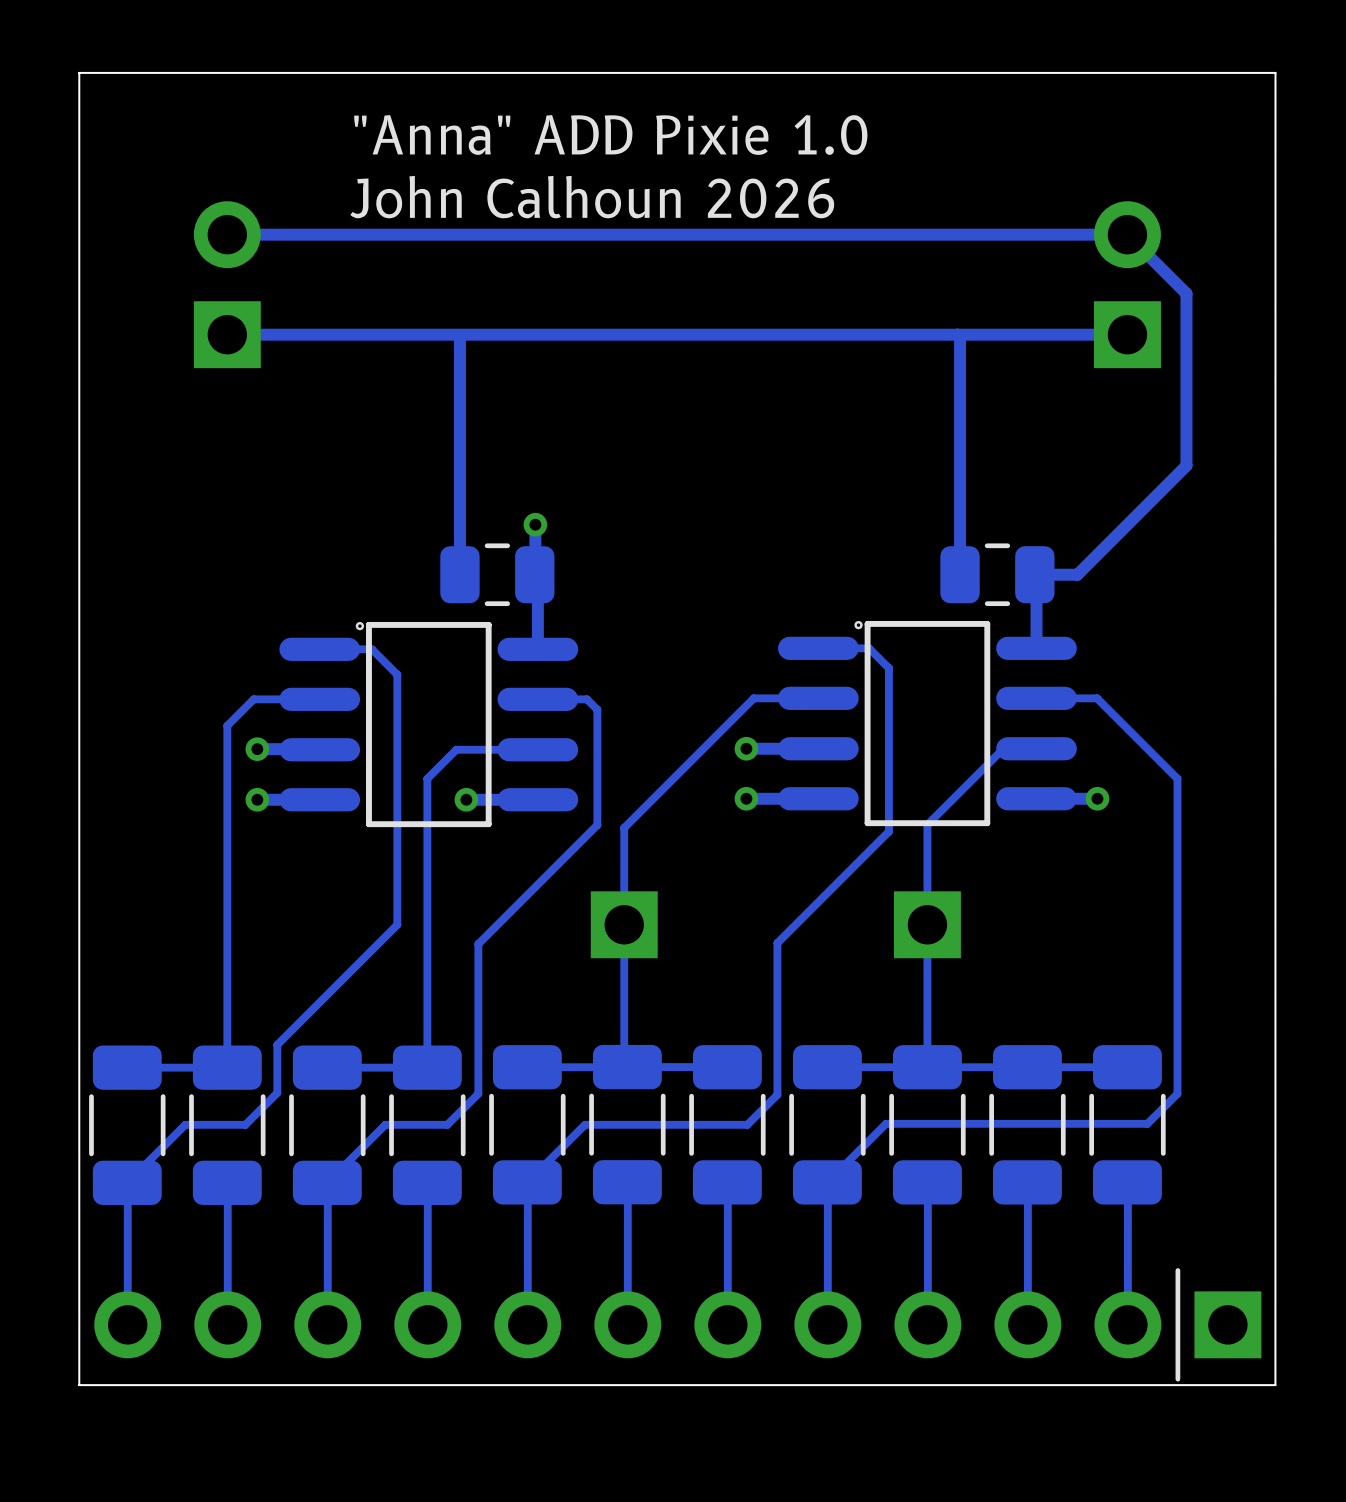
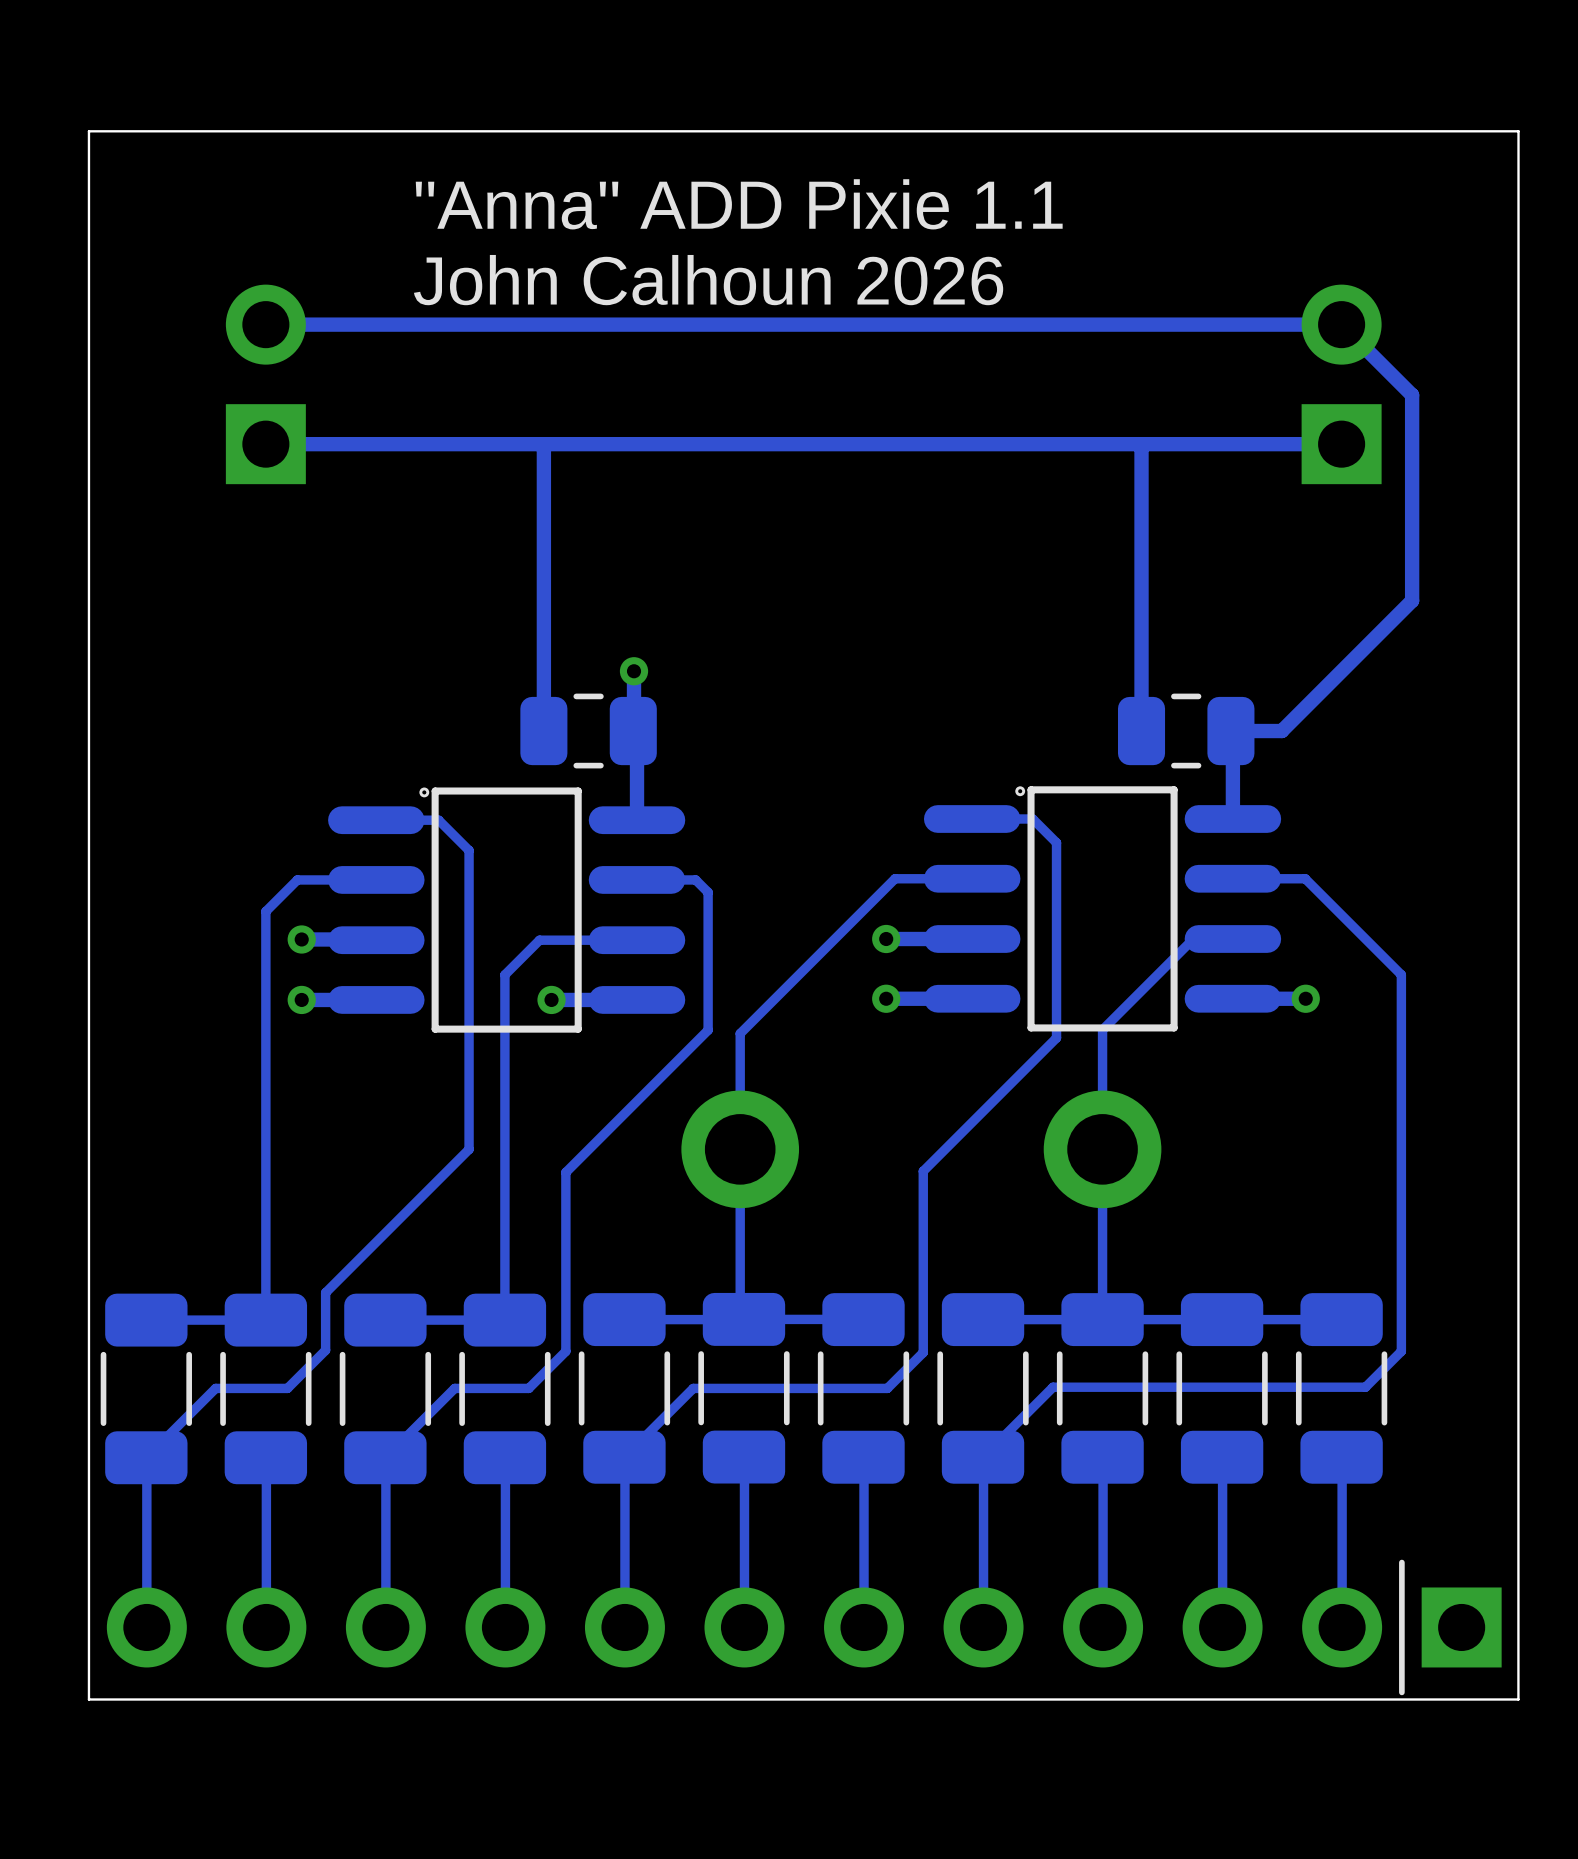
text: "Anna" ADD Pixie 1.0 (610, 134) -> "Anna" ADD Pixie 1.1 (739, 204)
part footprint: [590, 891, 658, 959] -> [681, 1090, 800, 1209]
part footprint: [893, 891, 961, 959] -> [1043, 1090, 1162, 1209]

